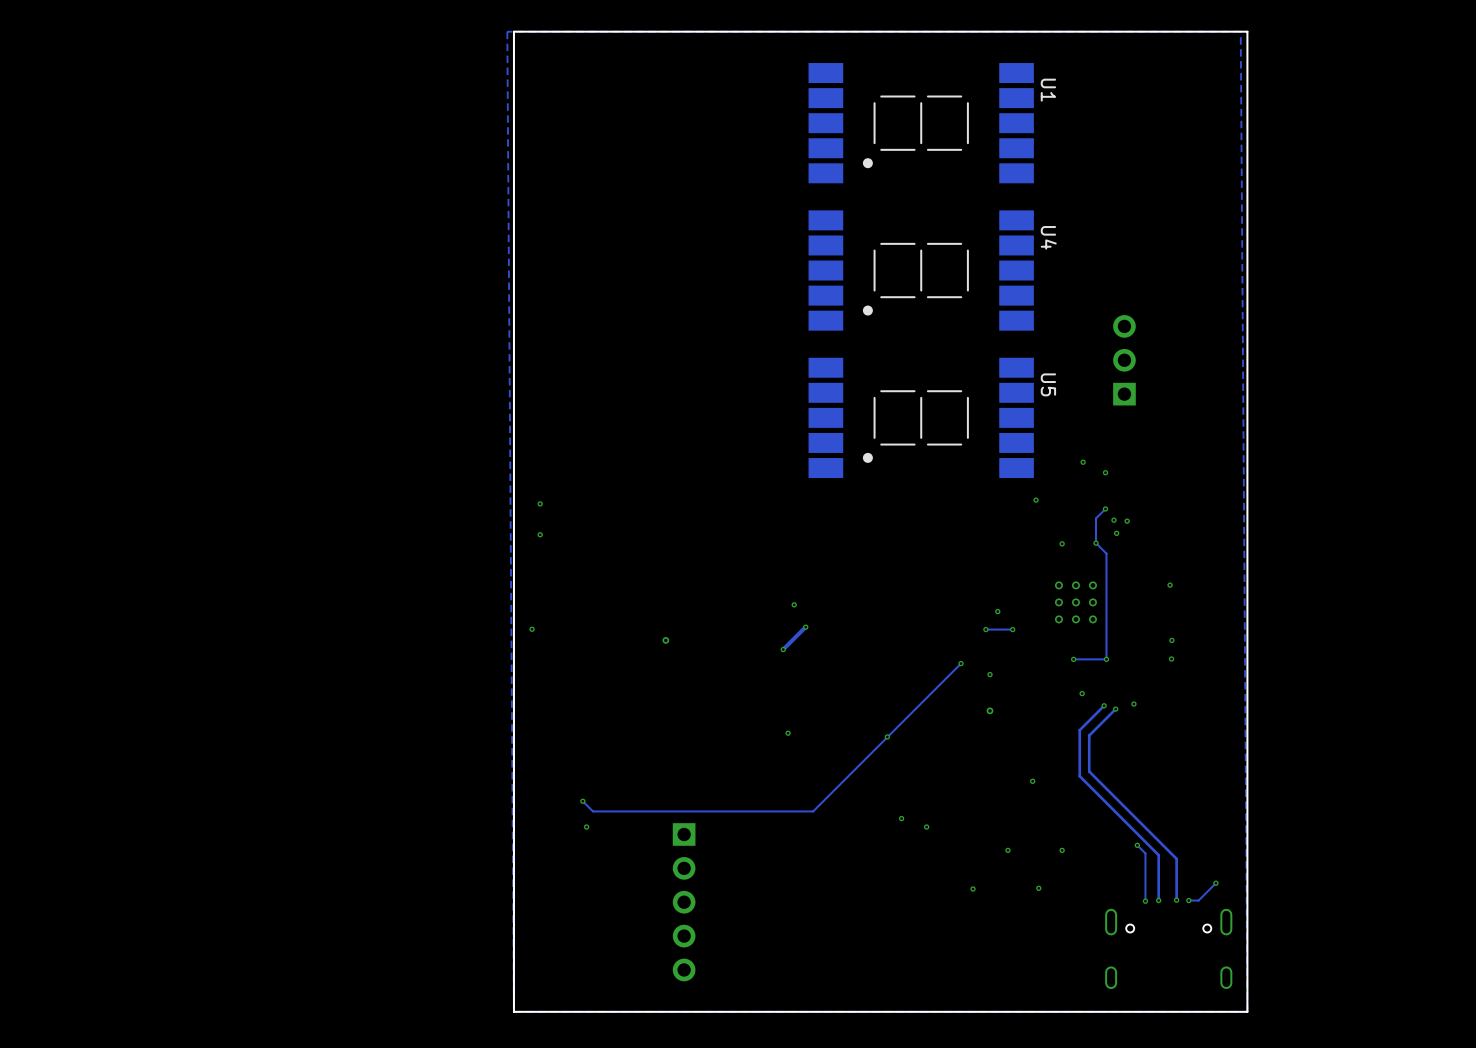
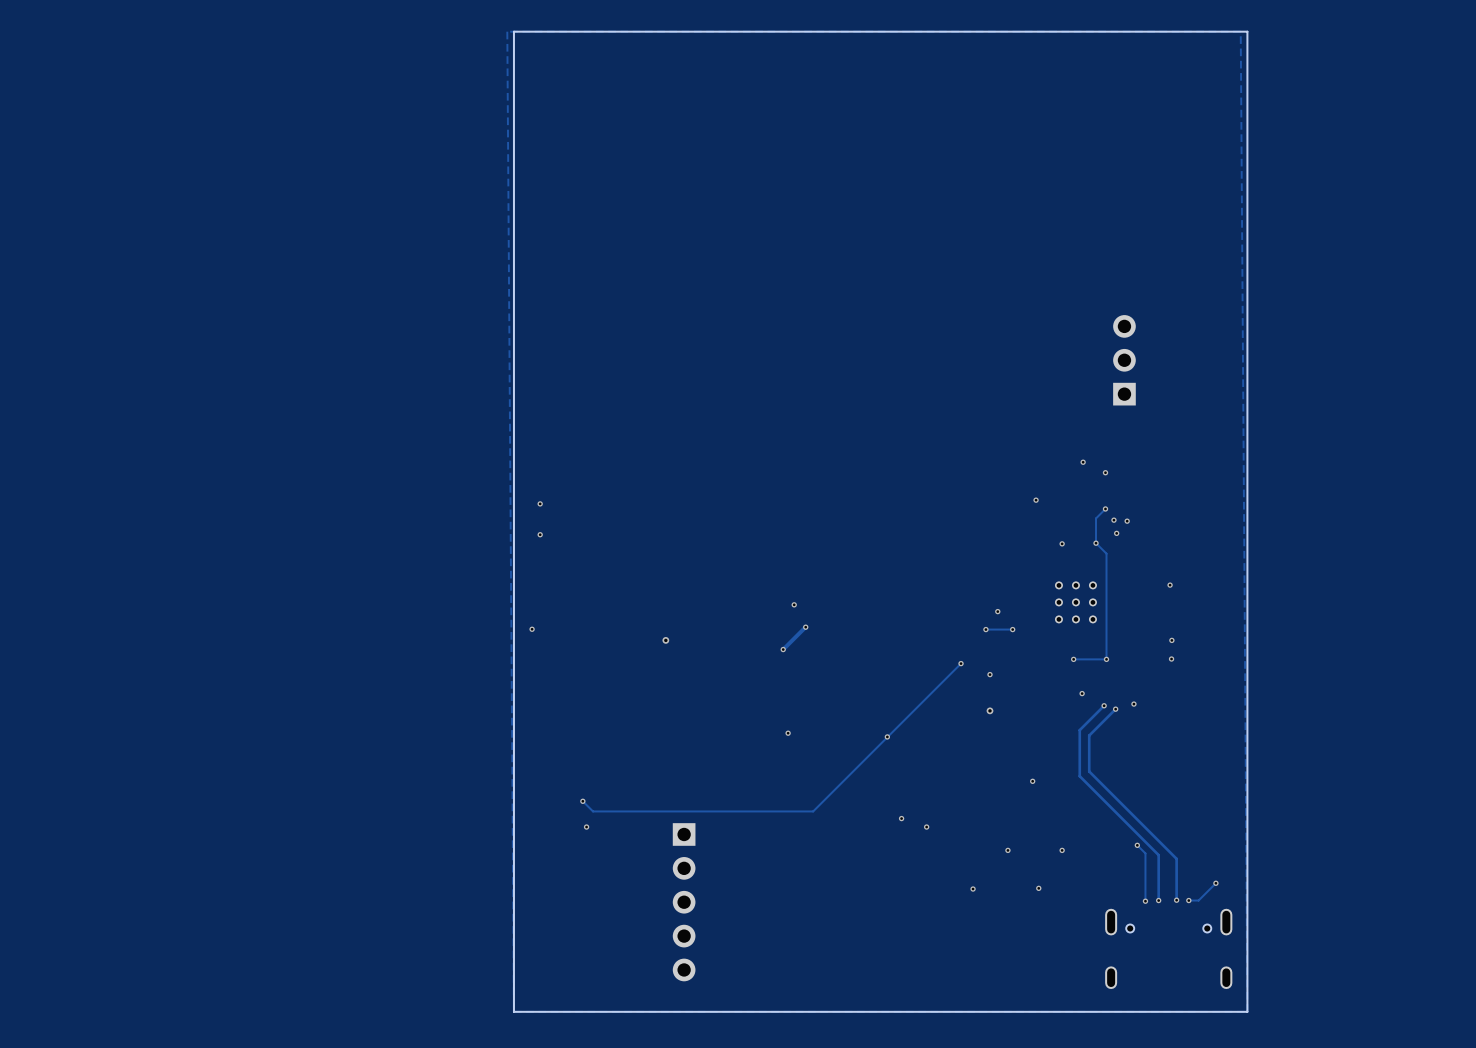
U1: (921, 123) -> none
U4: (921, 270) -> none
U5: (921, 417) -> none

